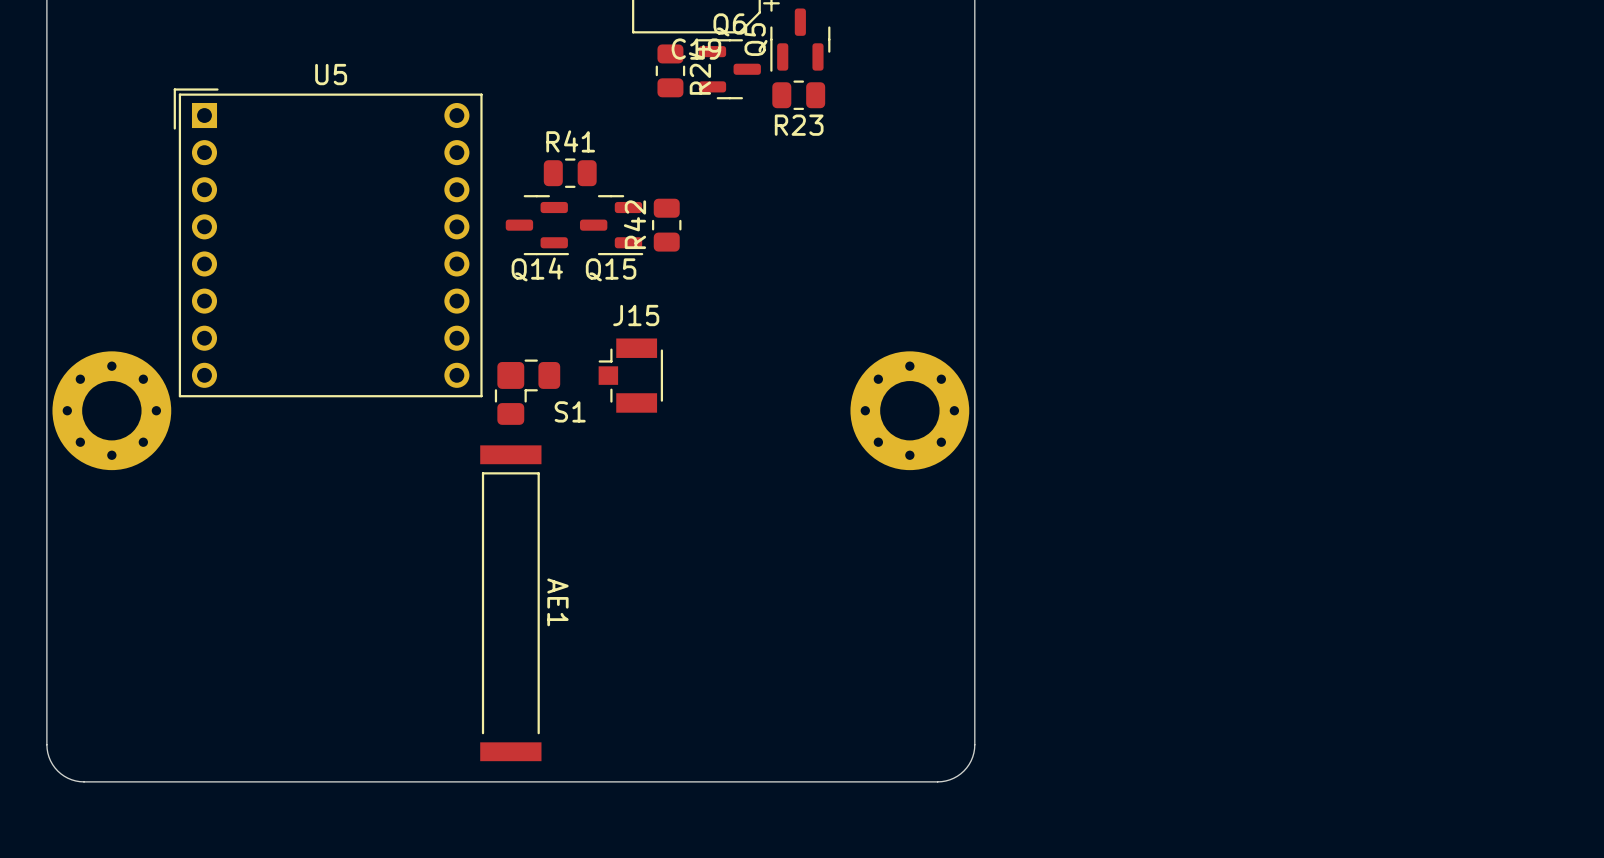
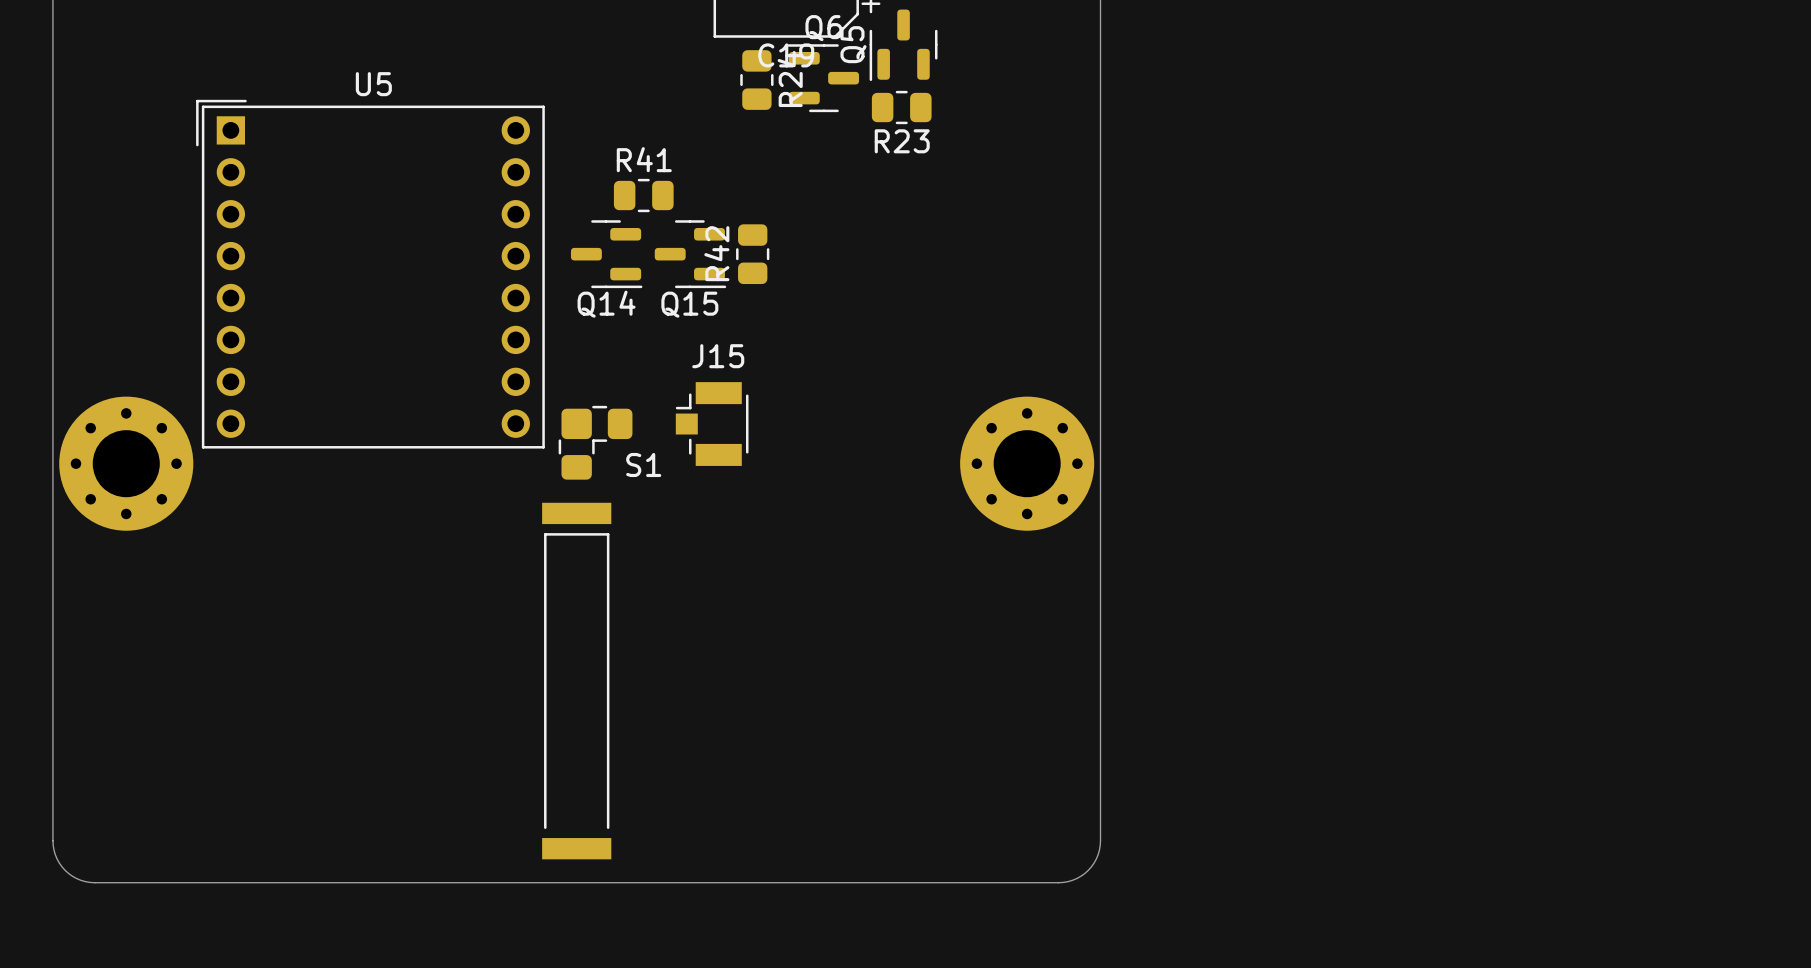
AE1 name: AE1 (557, 602) -> none

